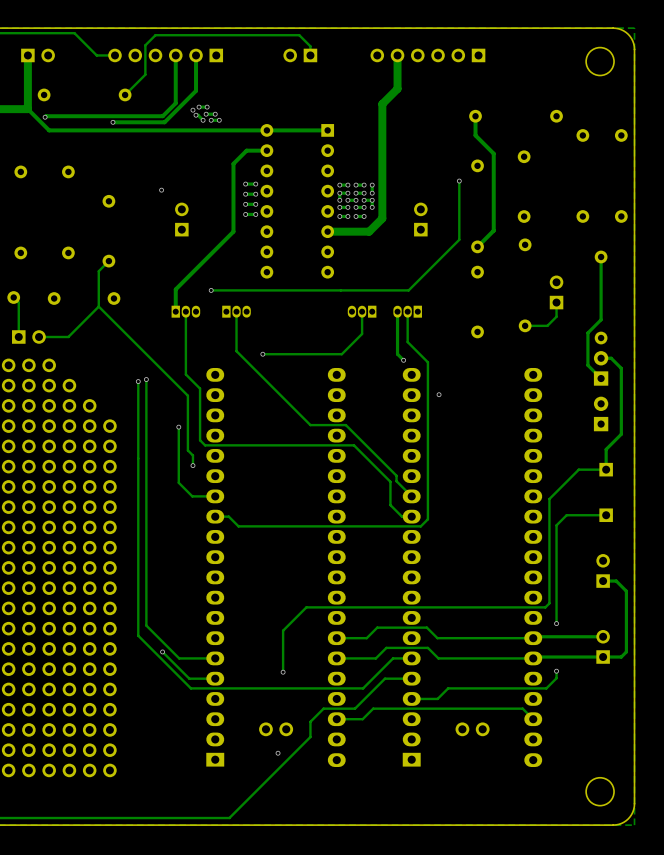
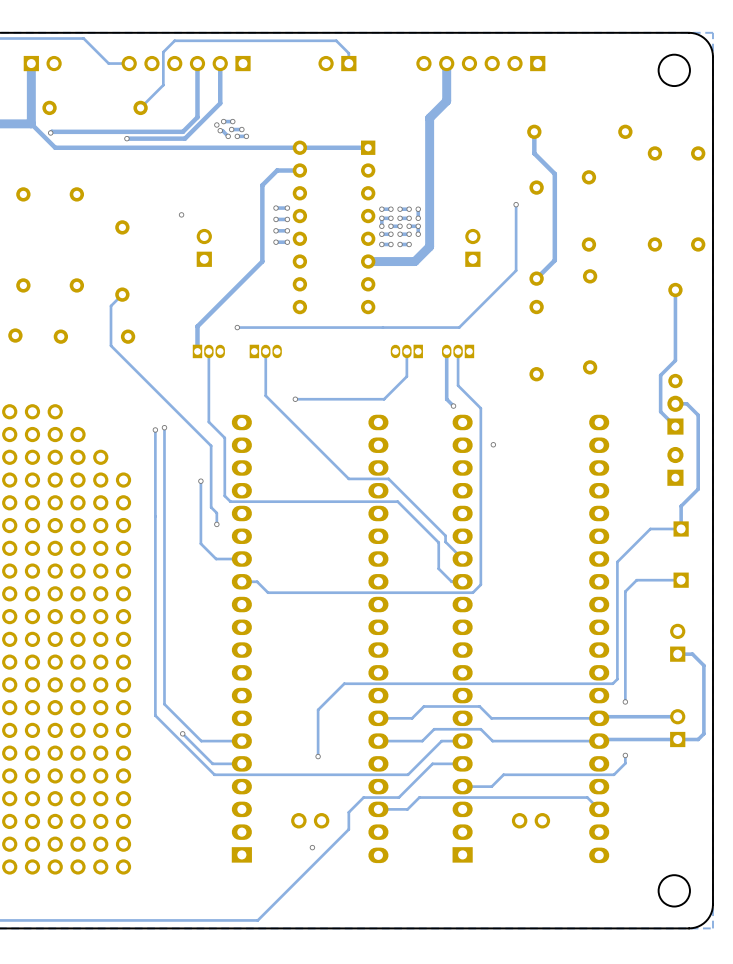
part: (556, 292) -> none
track: (13, 297) (18, 302) (18, 337) -> none
track: (556, 302) (556, 316) (547, 325) (525, 325) -> none
track: (98, 306) (68, 337) (39, 337) -> none
part: (28, 337) -> none

